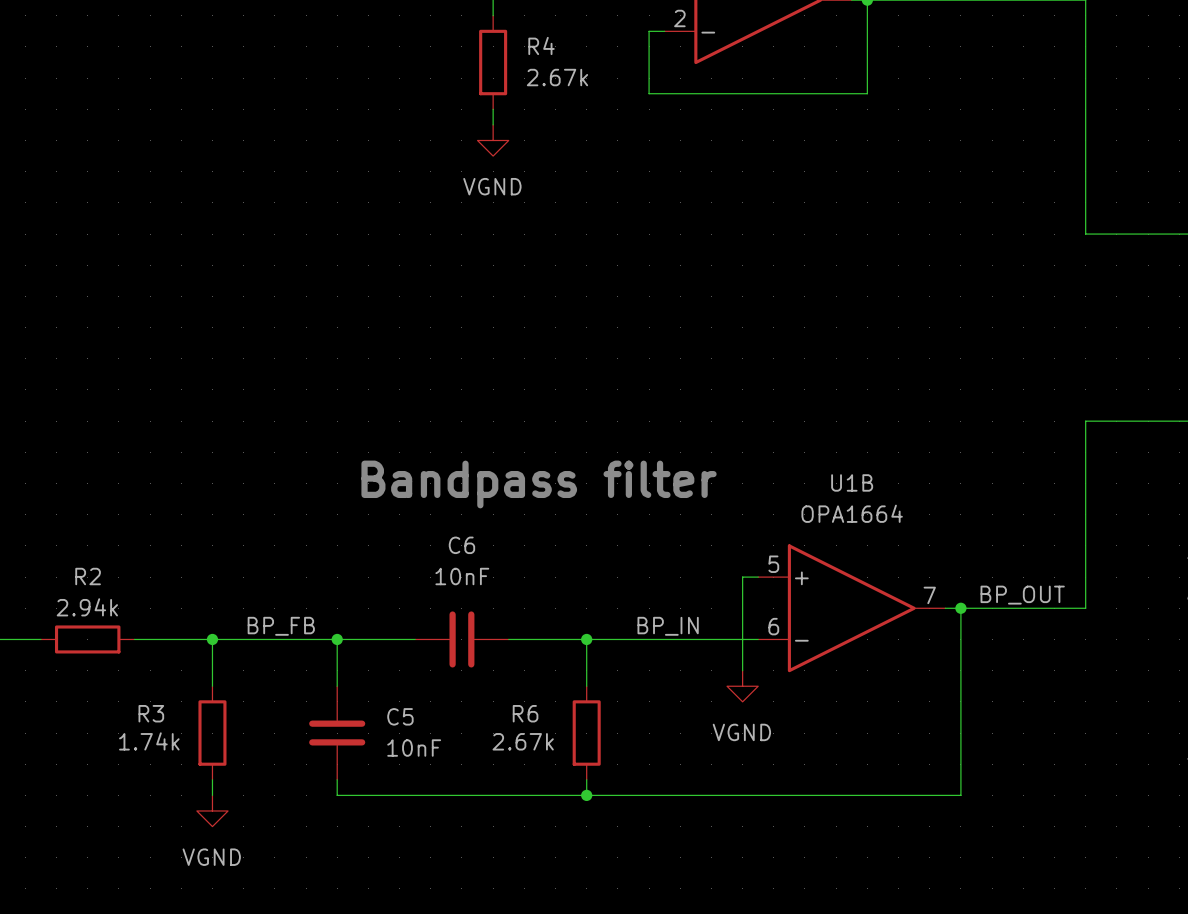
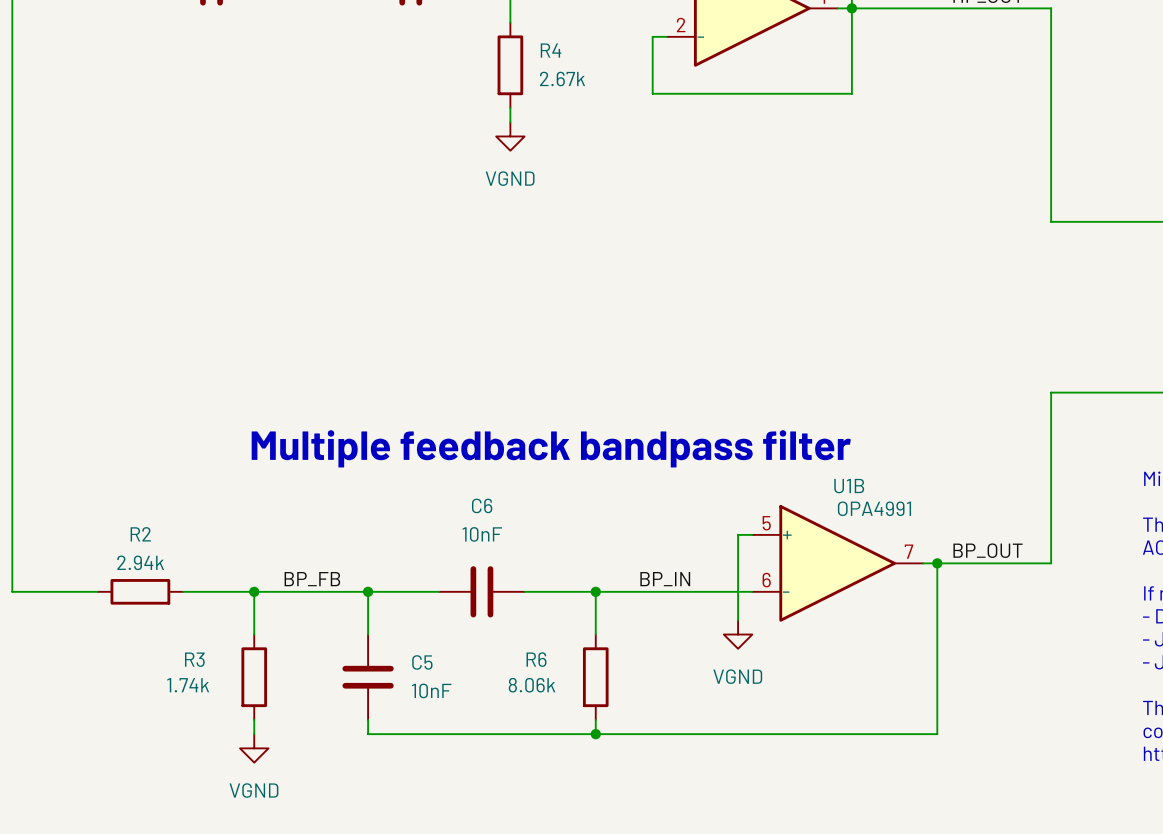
U1B name position: U1B (852, 482) -> U1B (849, 486)
text: Bandpass filter (539, 484) -> Multiple feedback bandpass filter (551, 448)
U1B value: OPA1664 (852, 513) -> OPA4991 (874, 508)
R6 value: 2.67k (523, 741) -> 8.06k (532, 685)

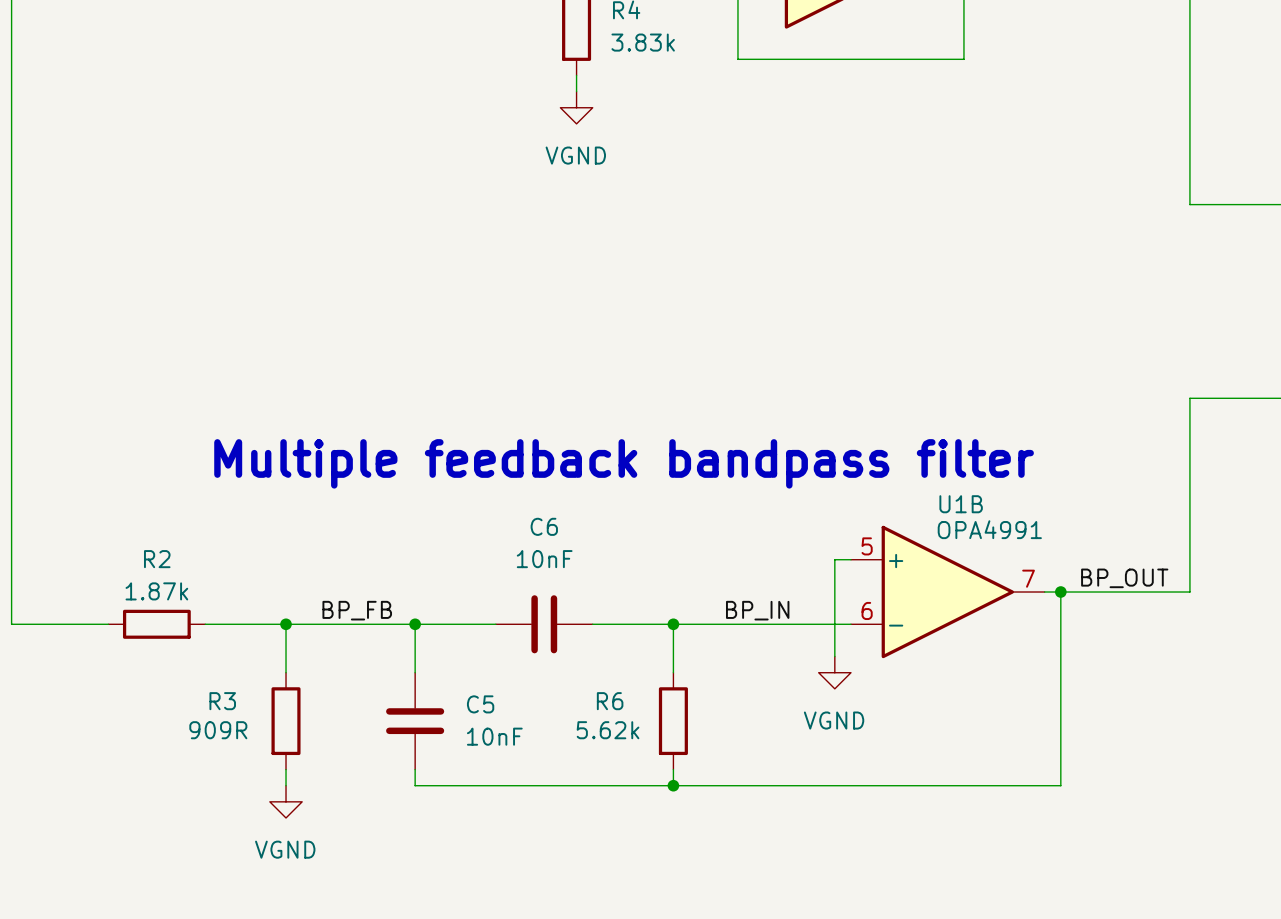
R4 value: 2.67k (562, 79) -> 3.83k (643, 42)
R2 value: 2.94k (140, 562) -> 1.87k (156, 591)
R3 value: 1.74k (188, 685) -> 909R (218, 730)
R6 value: 8.06k (532, 685) -> 5.62k (608, 730)

